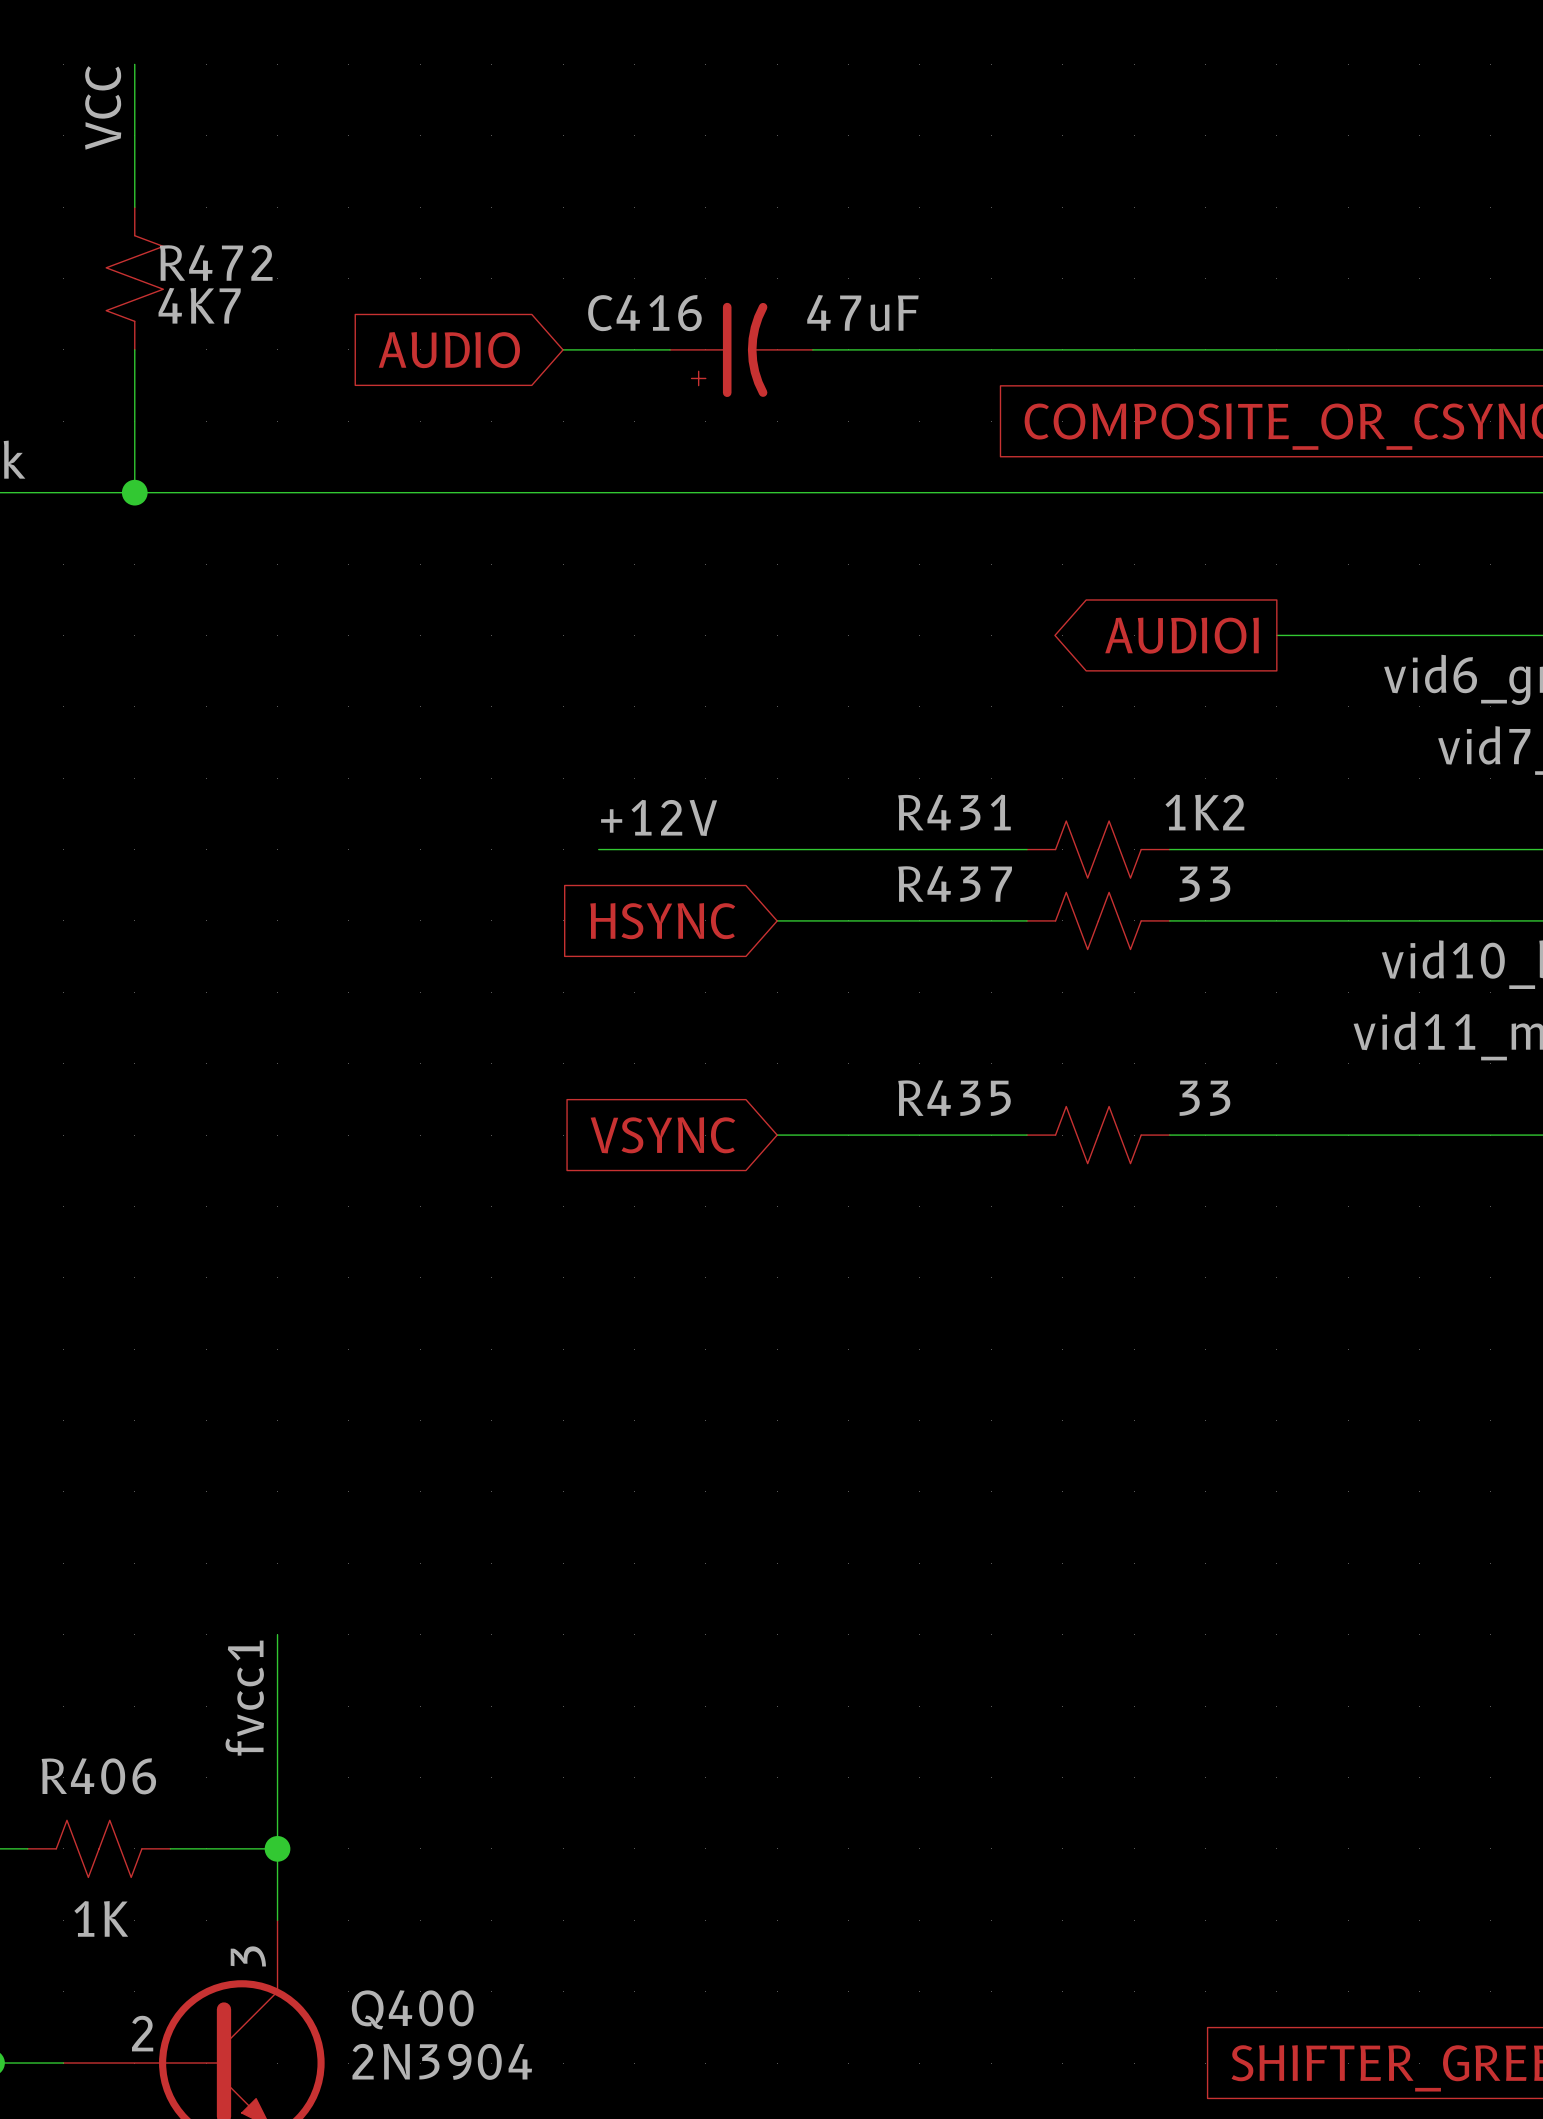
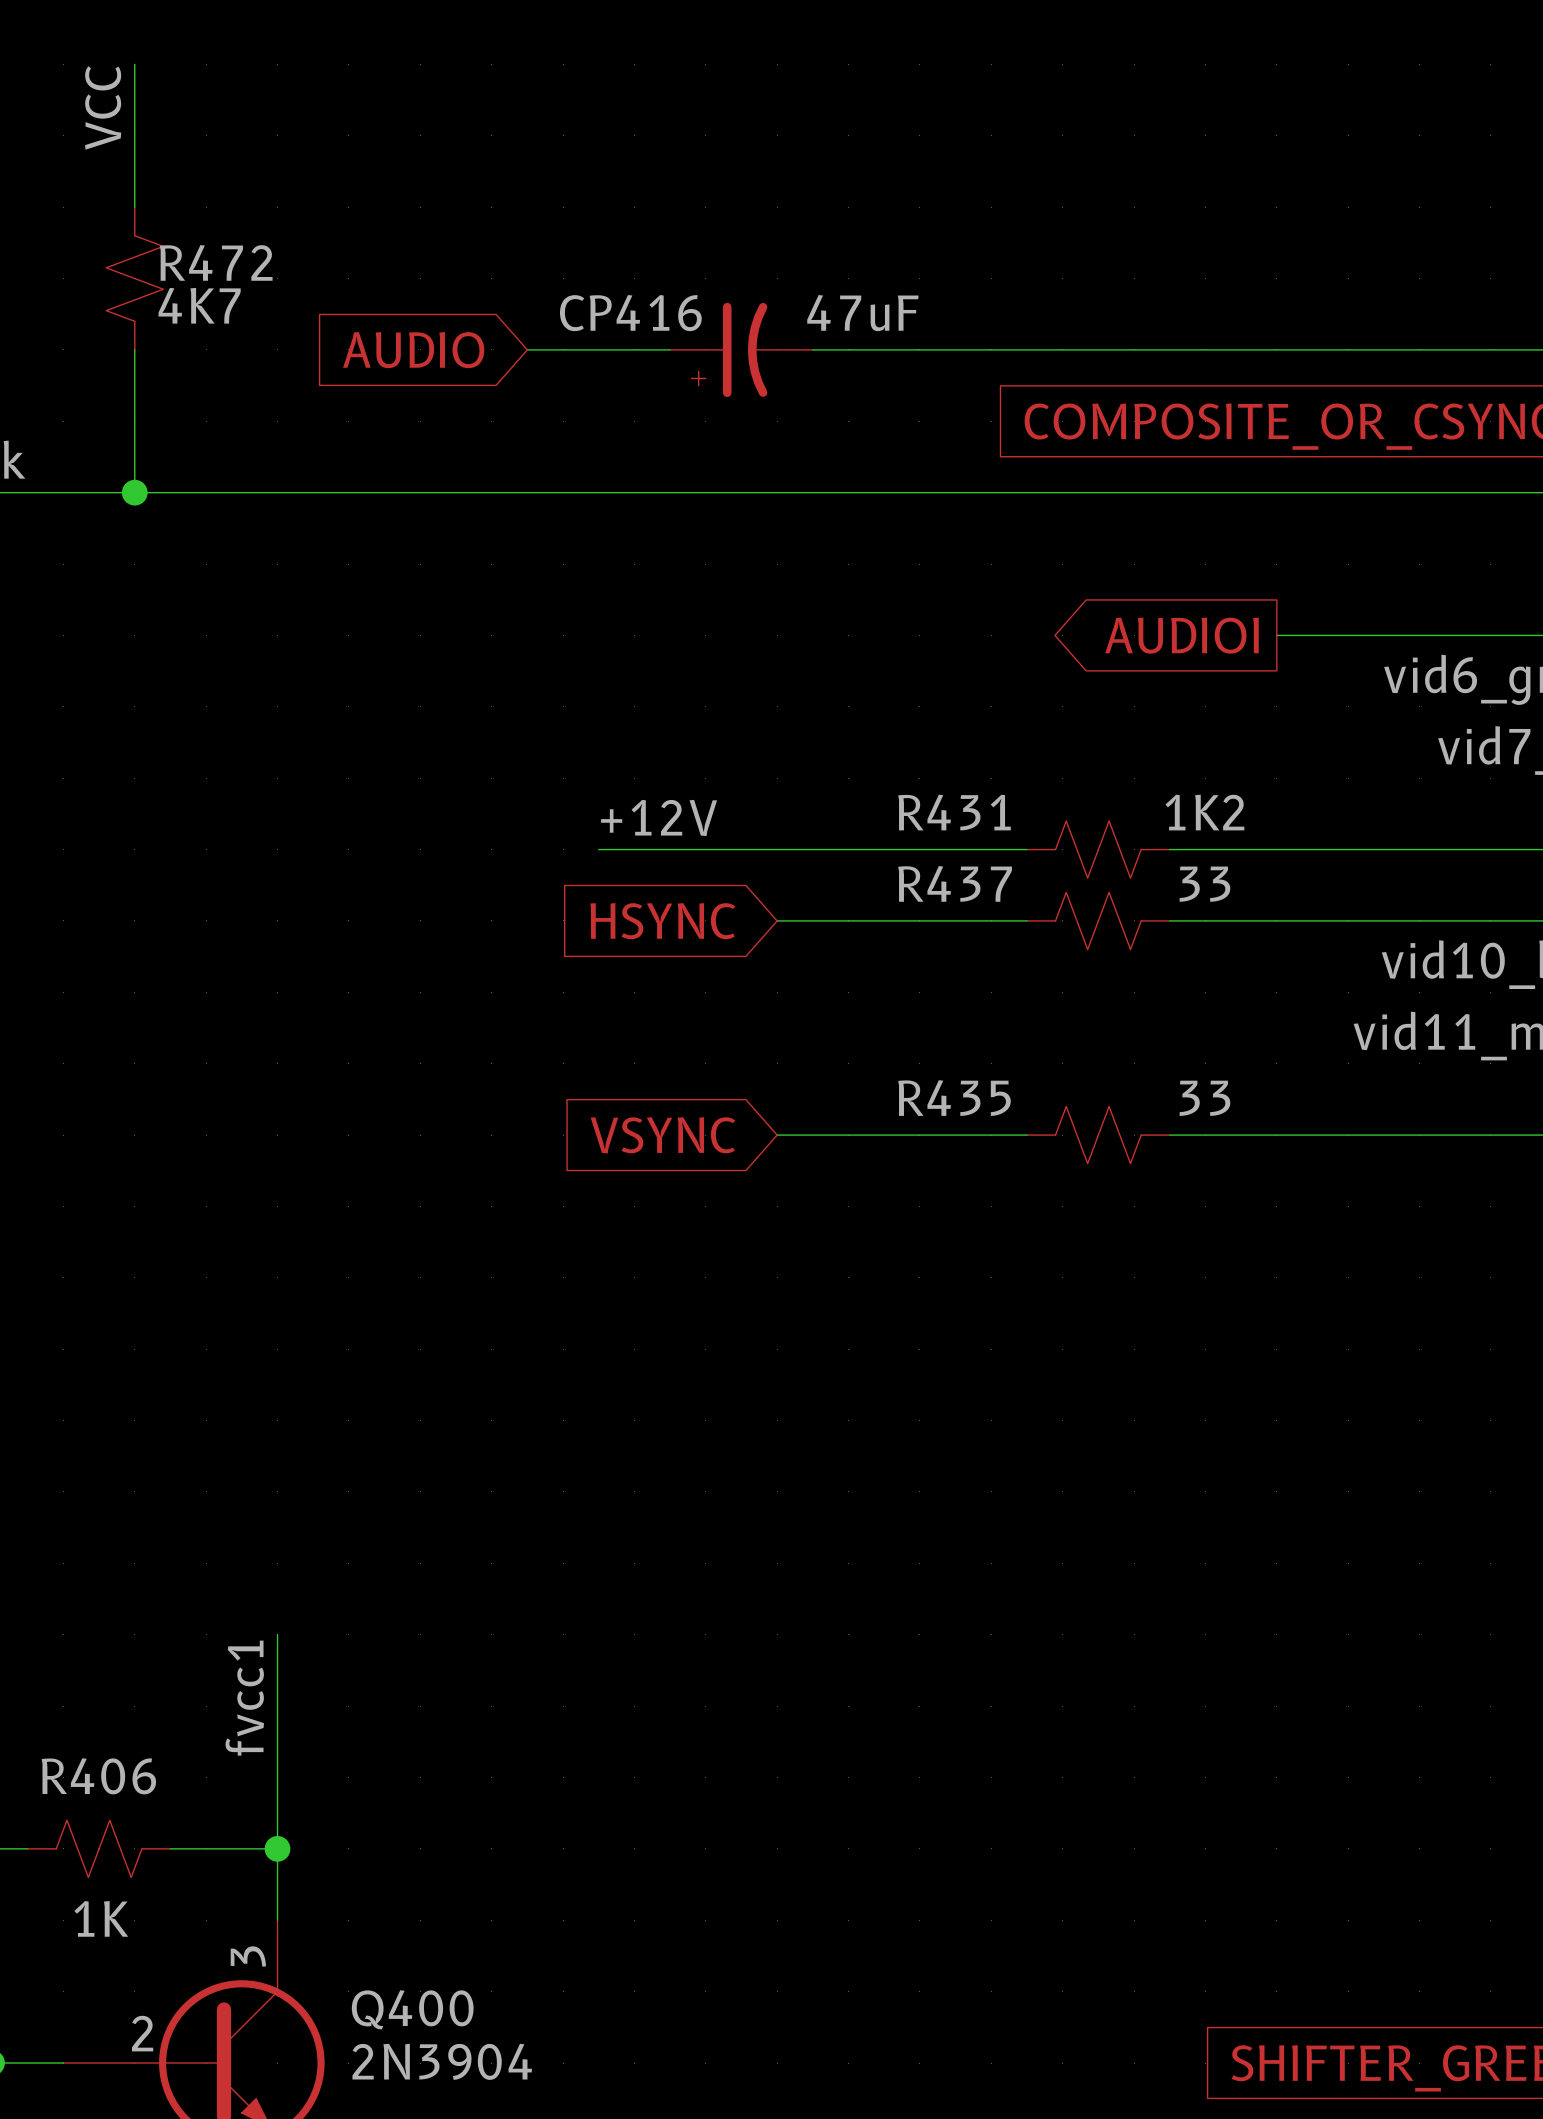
C416 name: C416 (644, 313) -> CP416 (630, 313)
wire: none -> (527, 349) (563, 349)
global label position: AUDIO (449, 350) -> AUDIO (413, 350)

